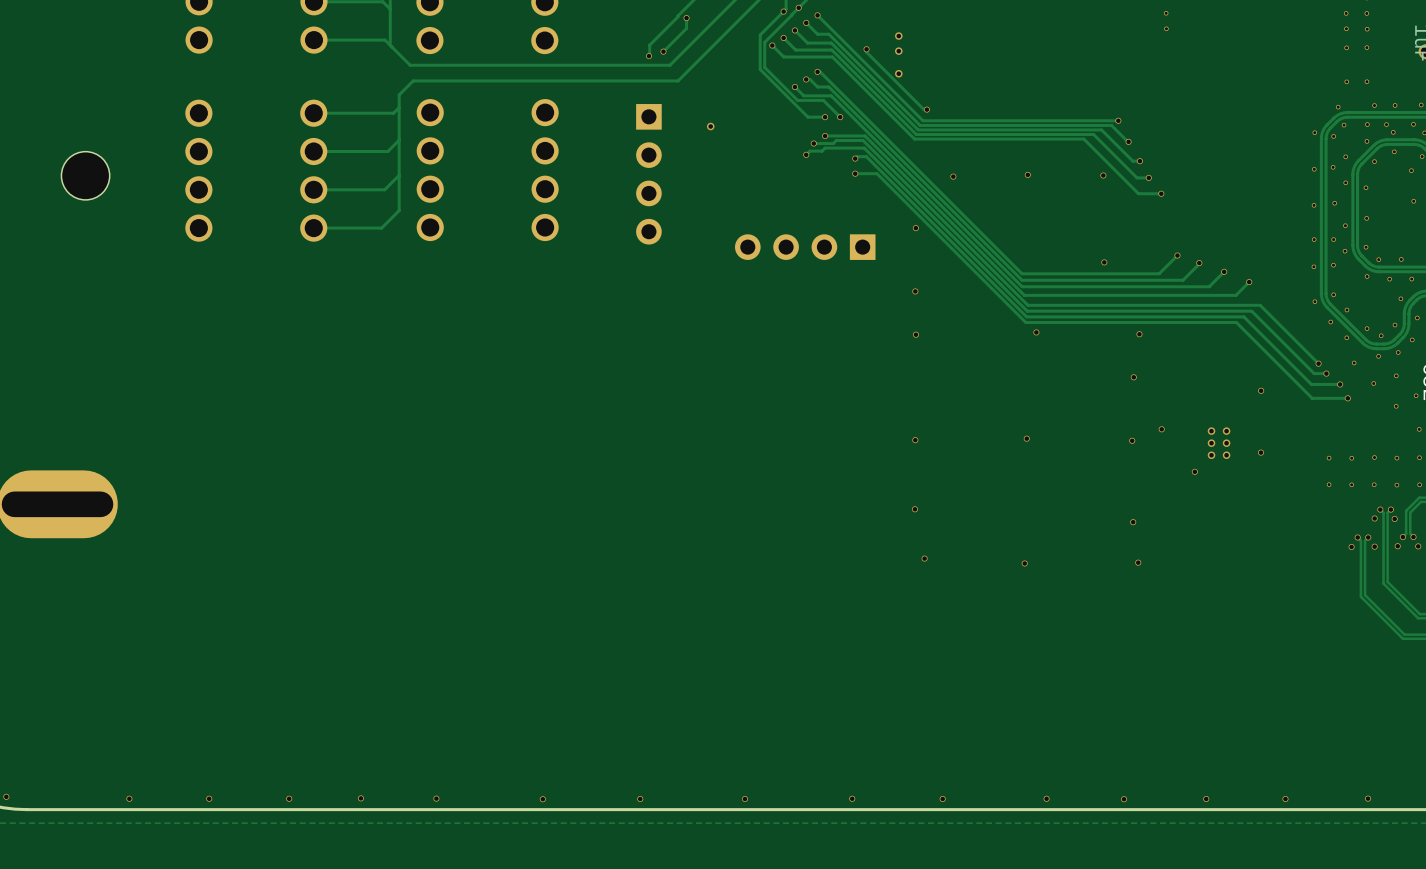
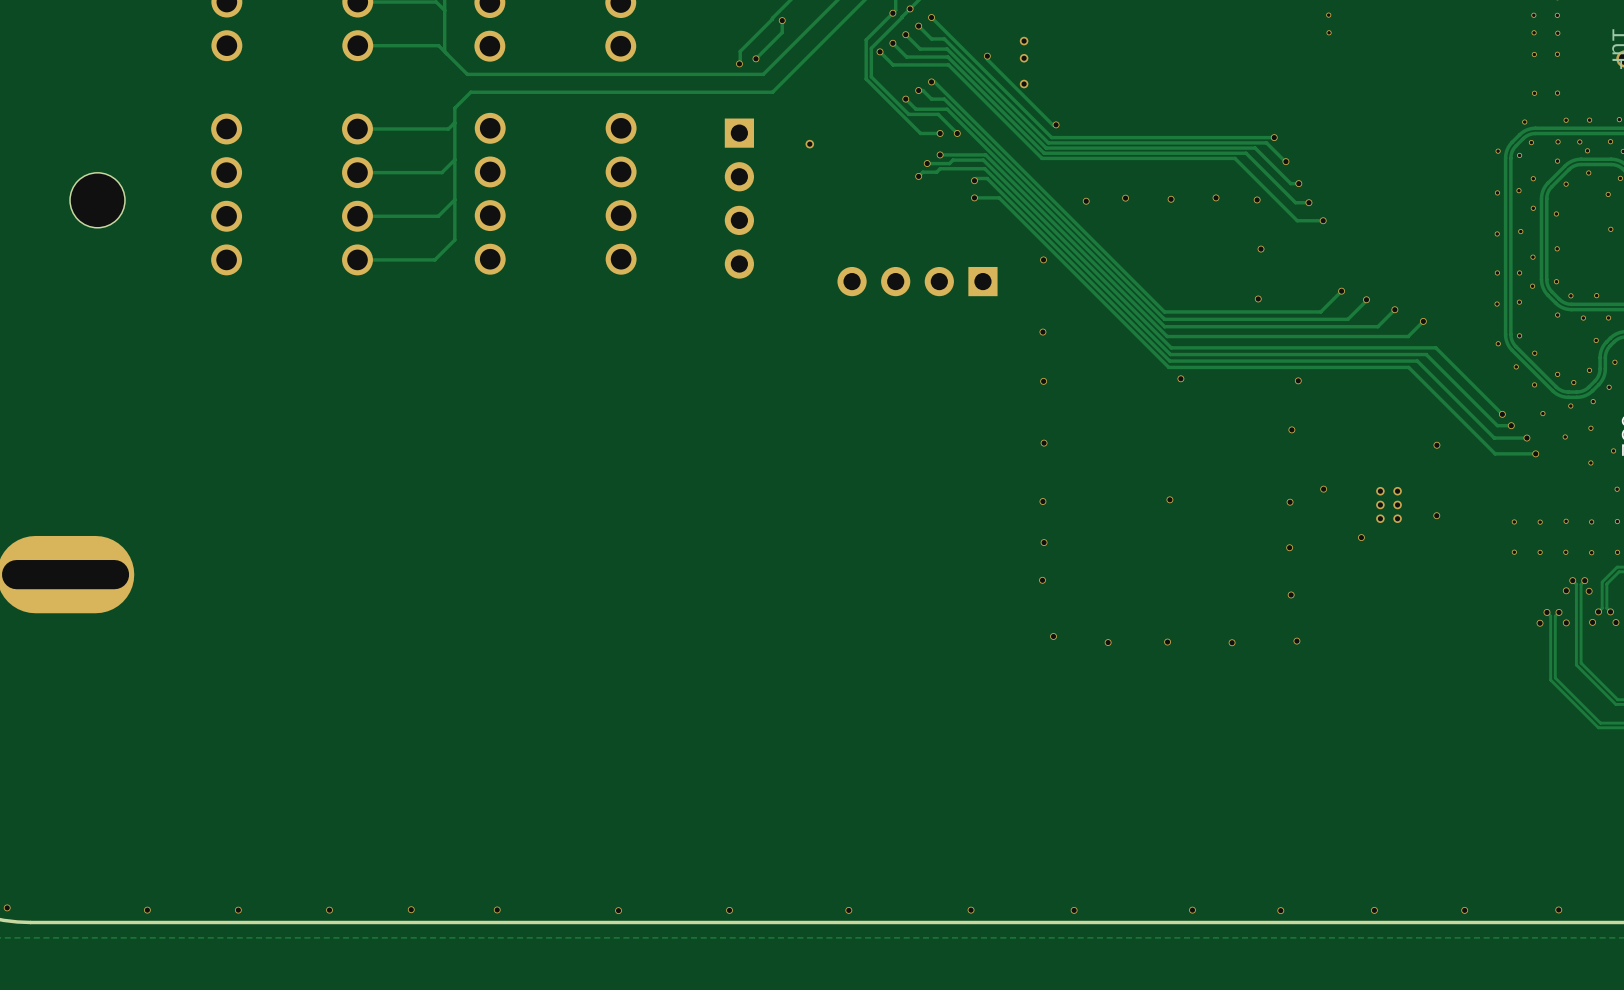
via: none -> (1125, 198)
via: none -> (1216, 197)
via: none -> (1261, 249)
via: none -> (1044, 443)
via: none -> (1044, 542)
via: none -> (1289, 547)
via: none -> (1108, 642)
via: none -> (1232, 642)

